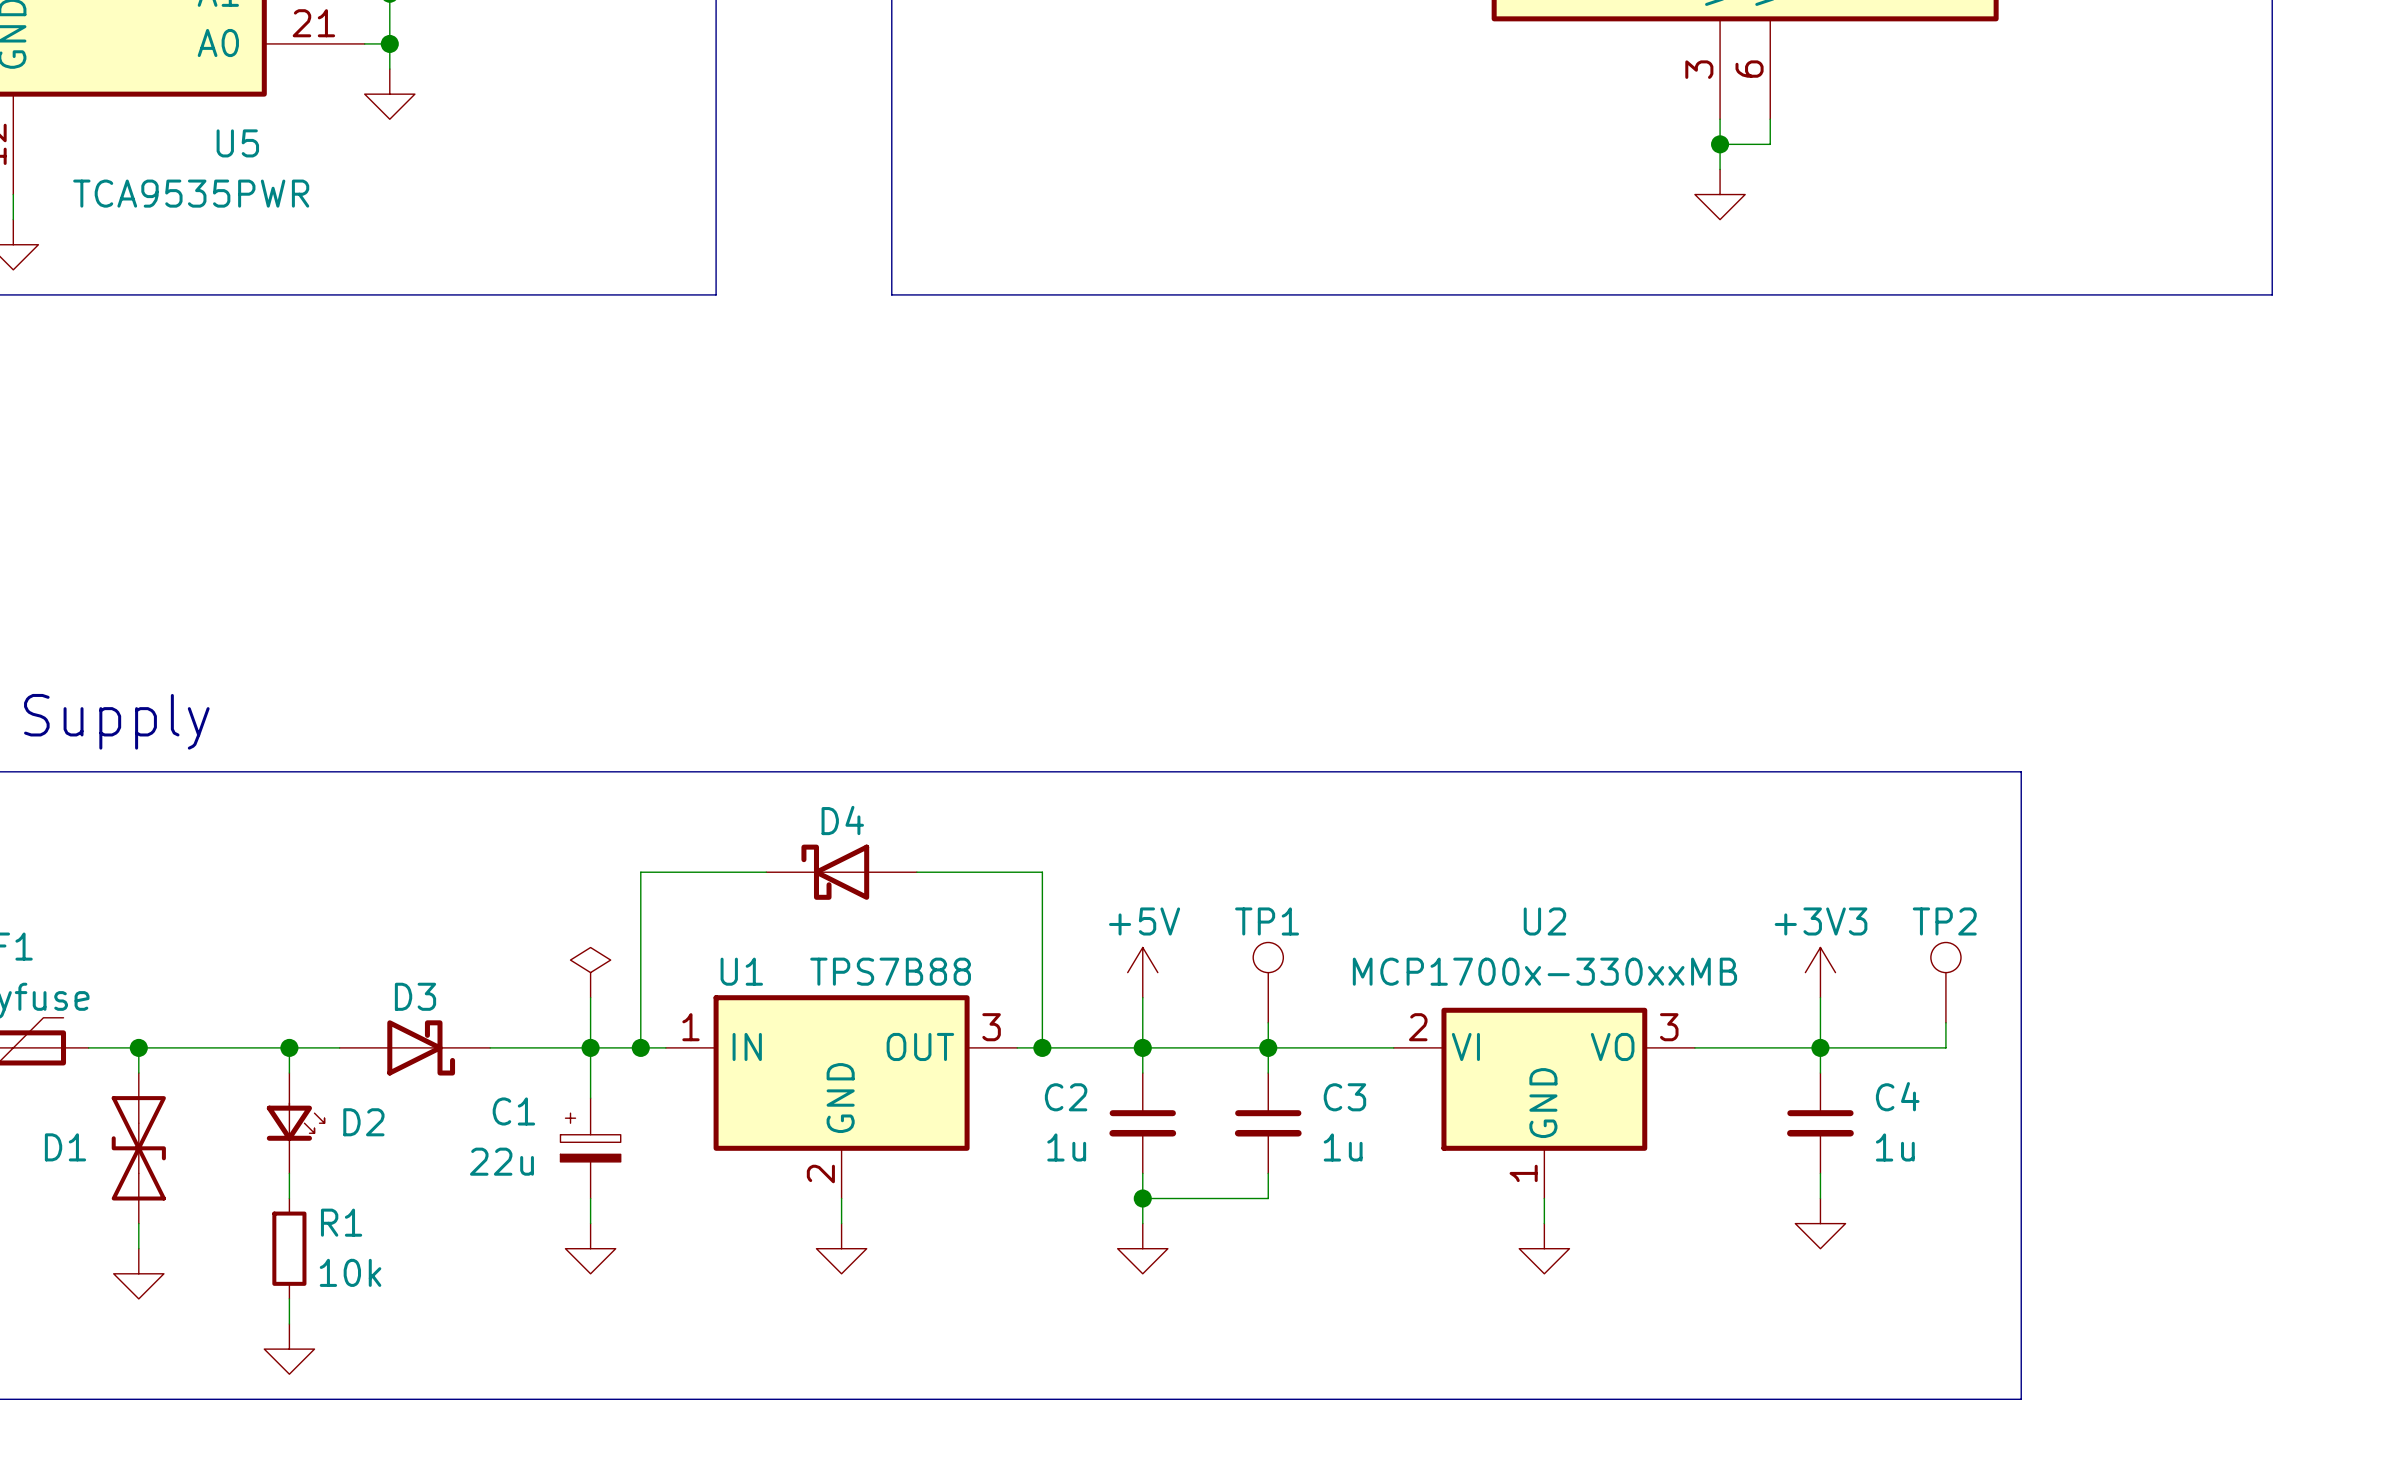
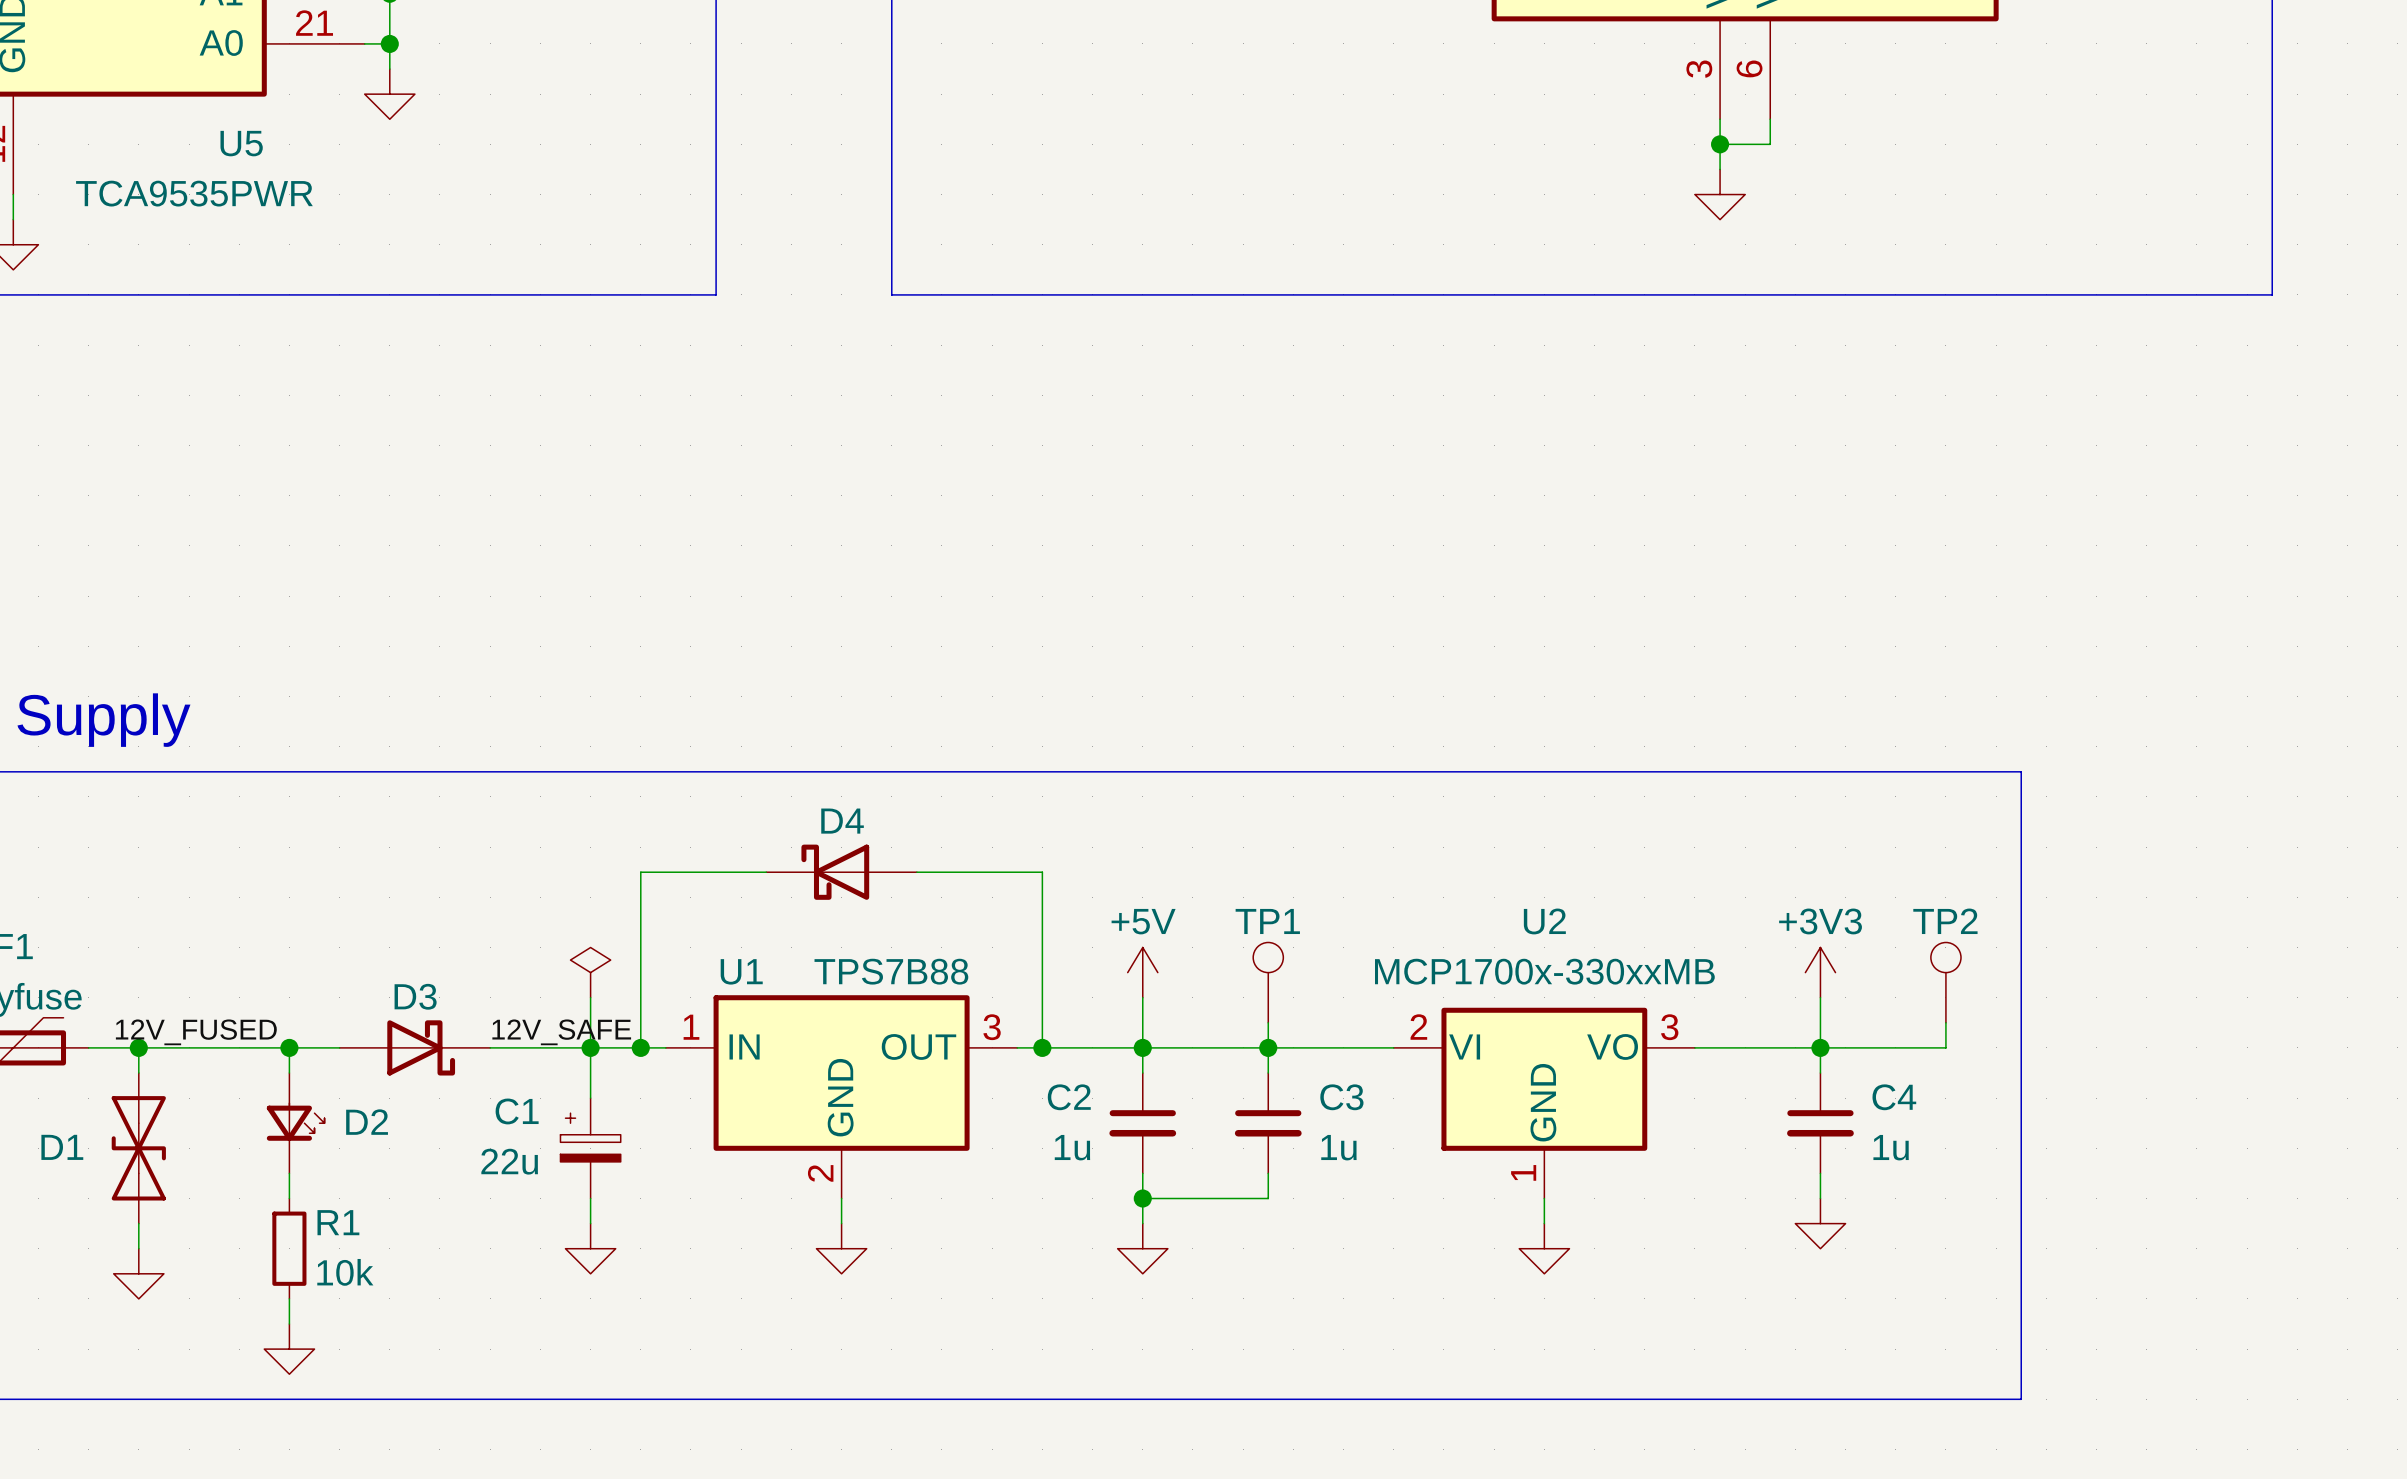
label: none -> 12V_FUSED (196, 1032)
label: none -> 12V_SAFE (561, 1032)

